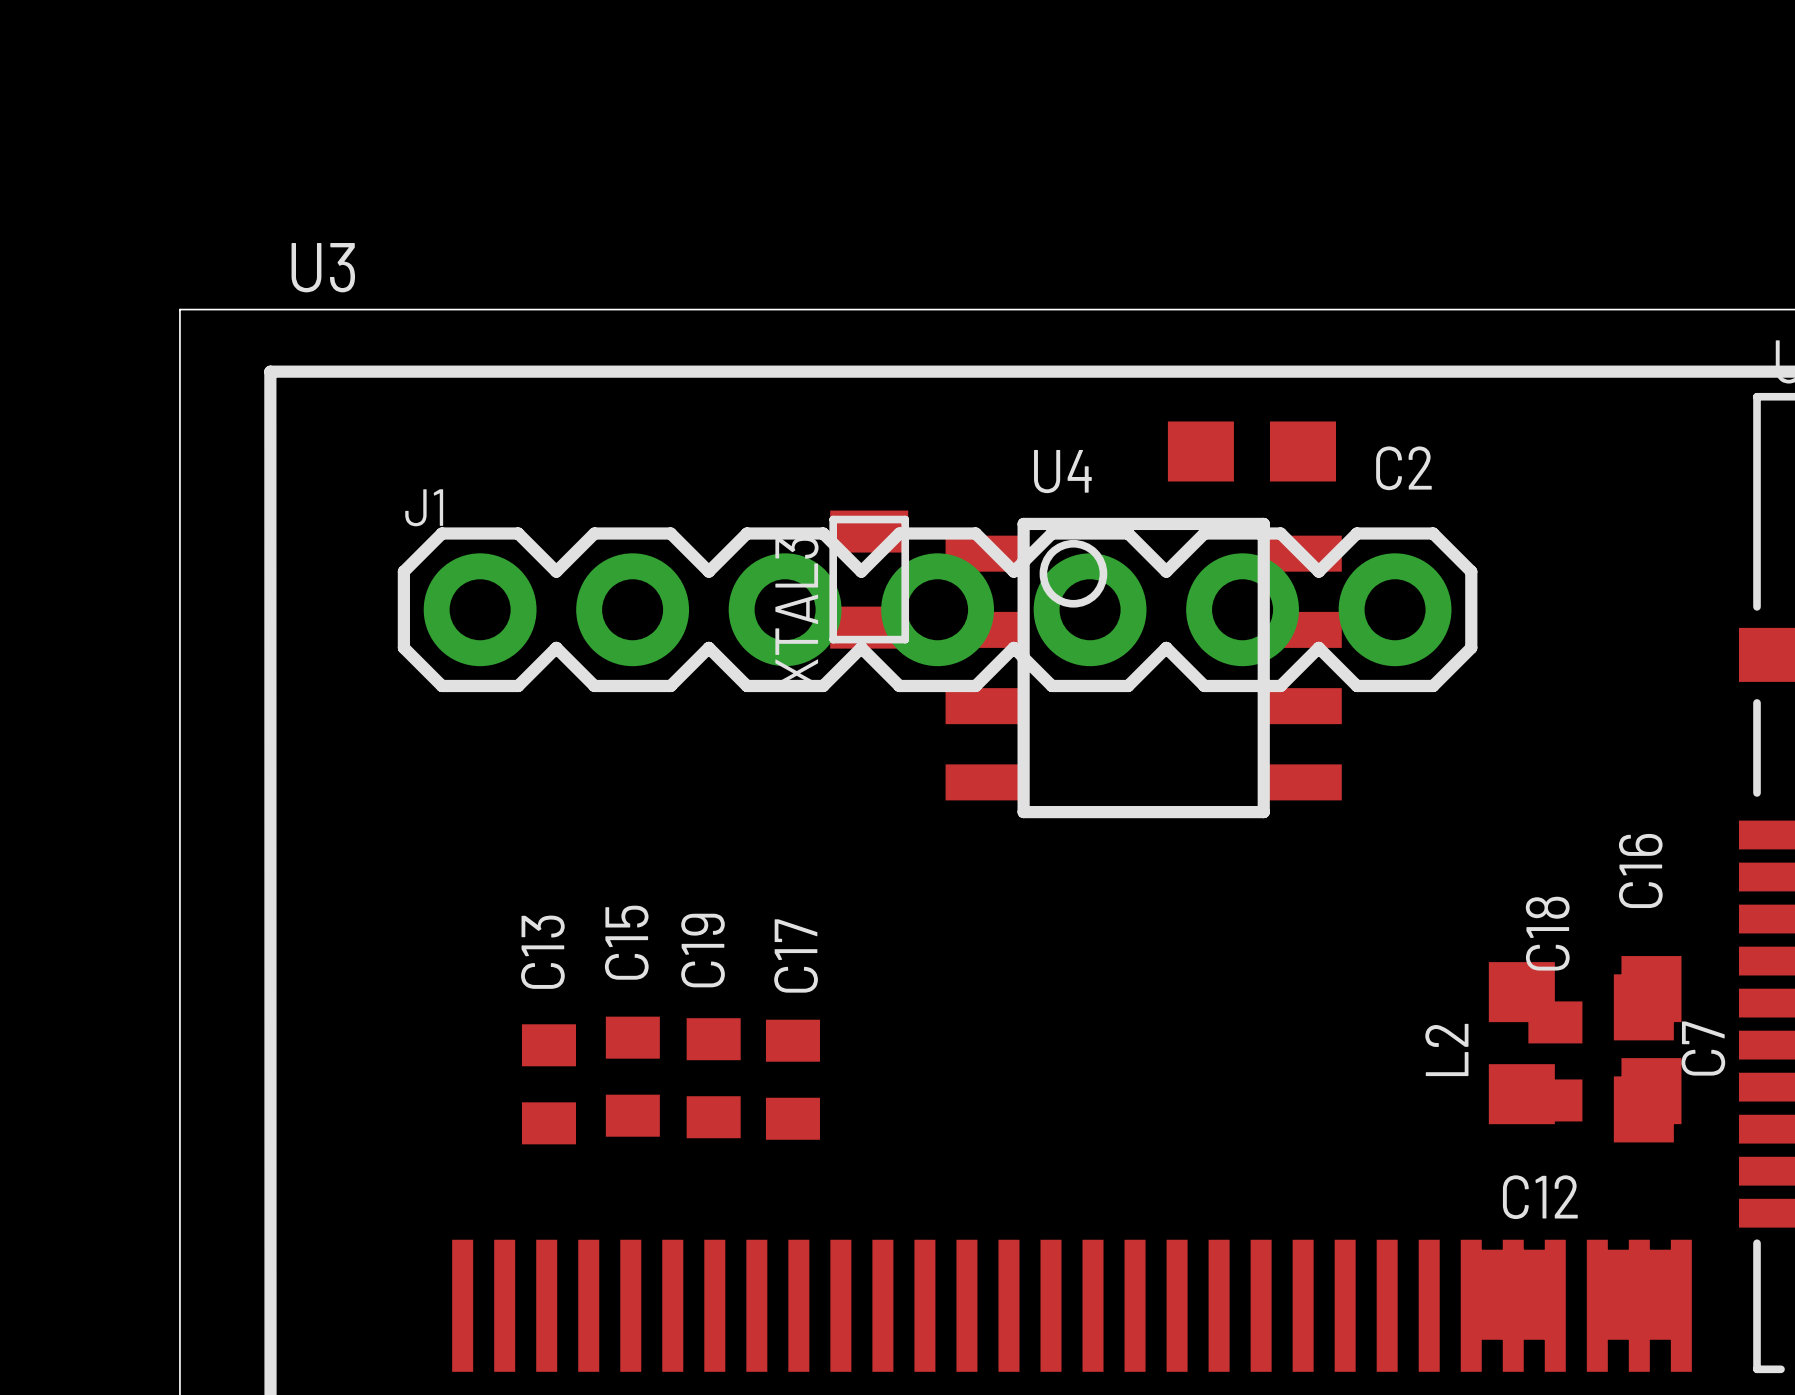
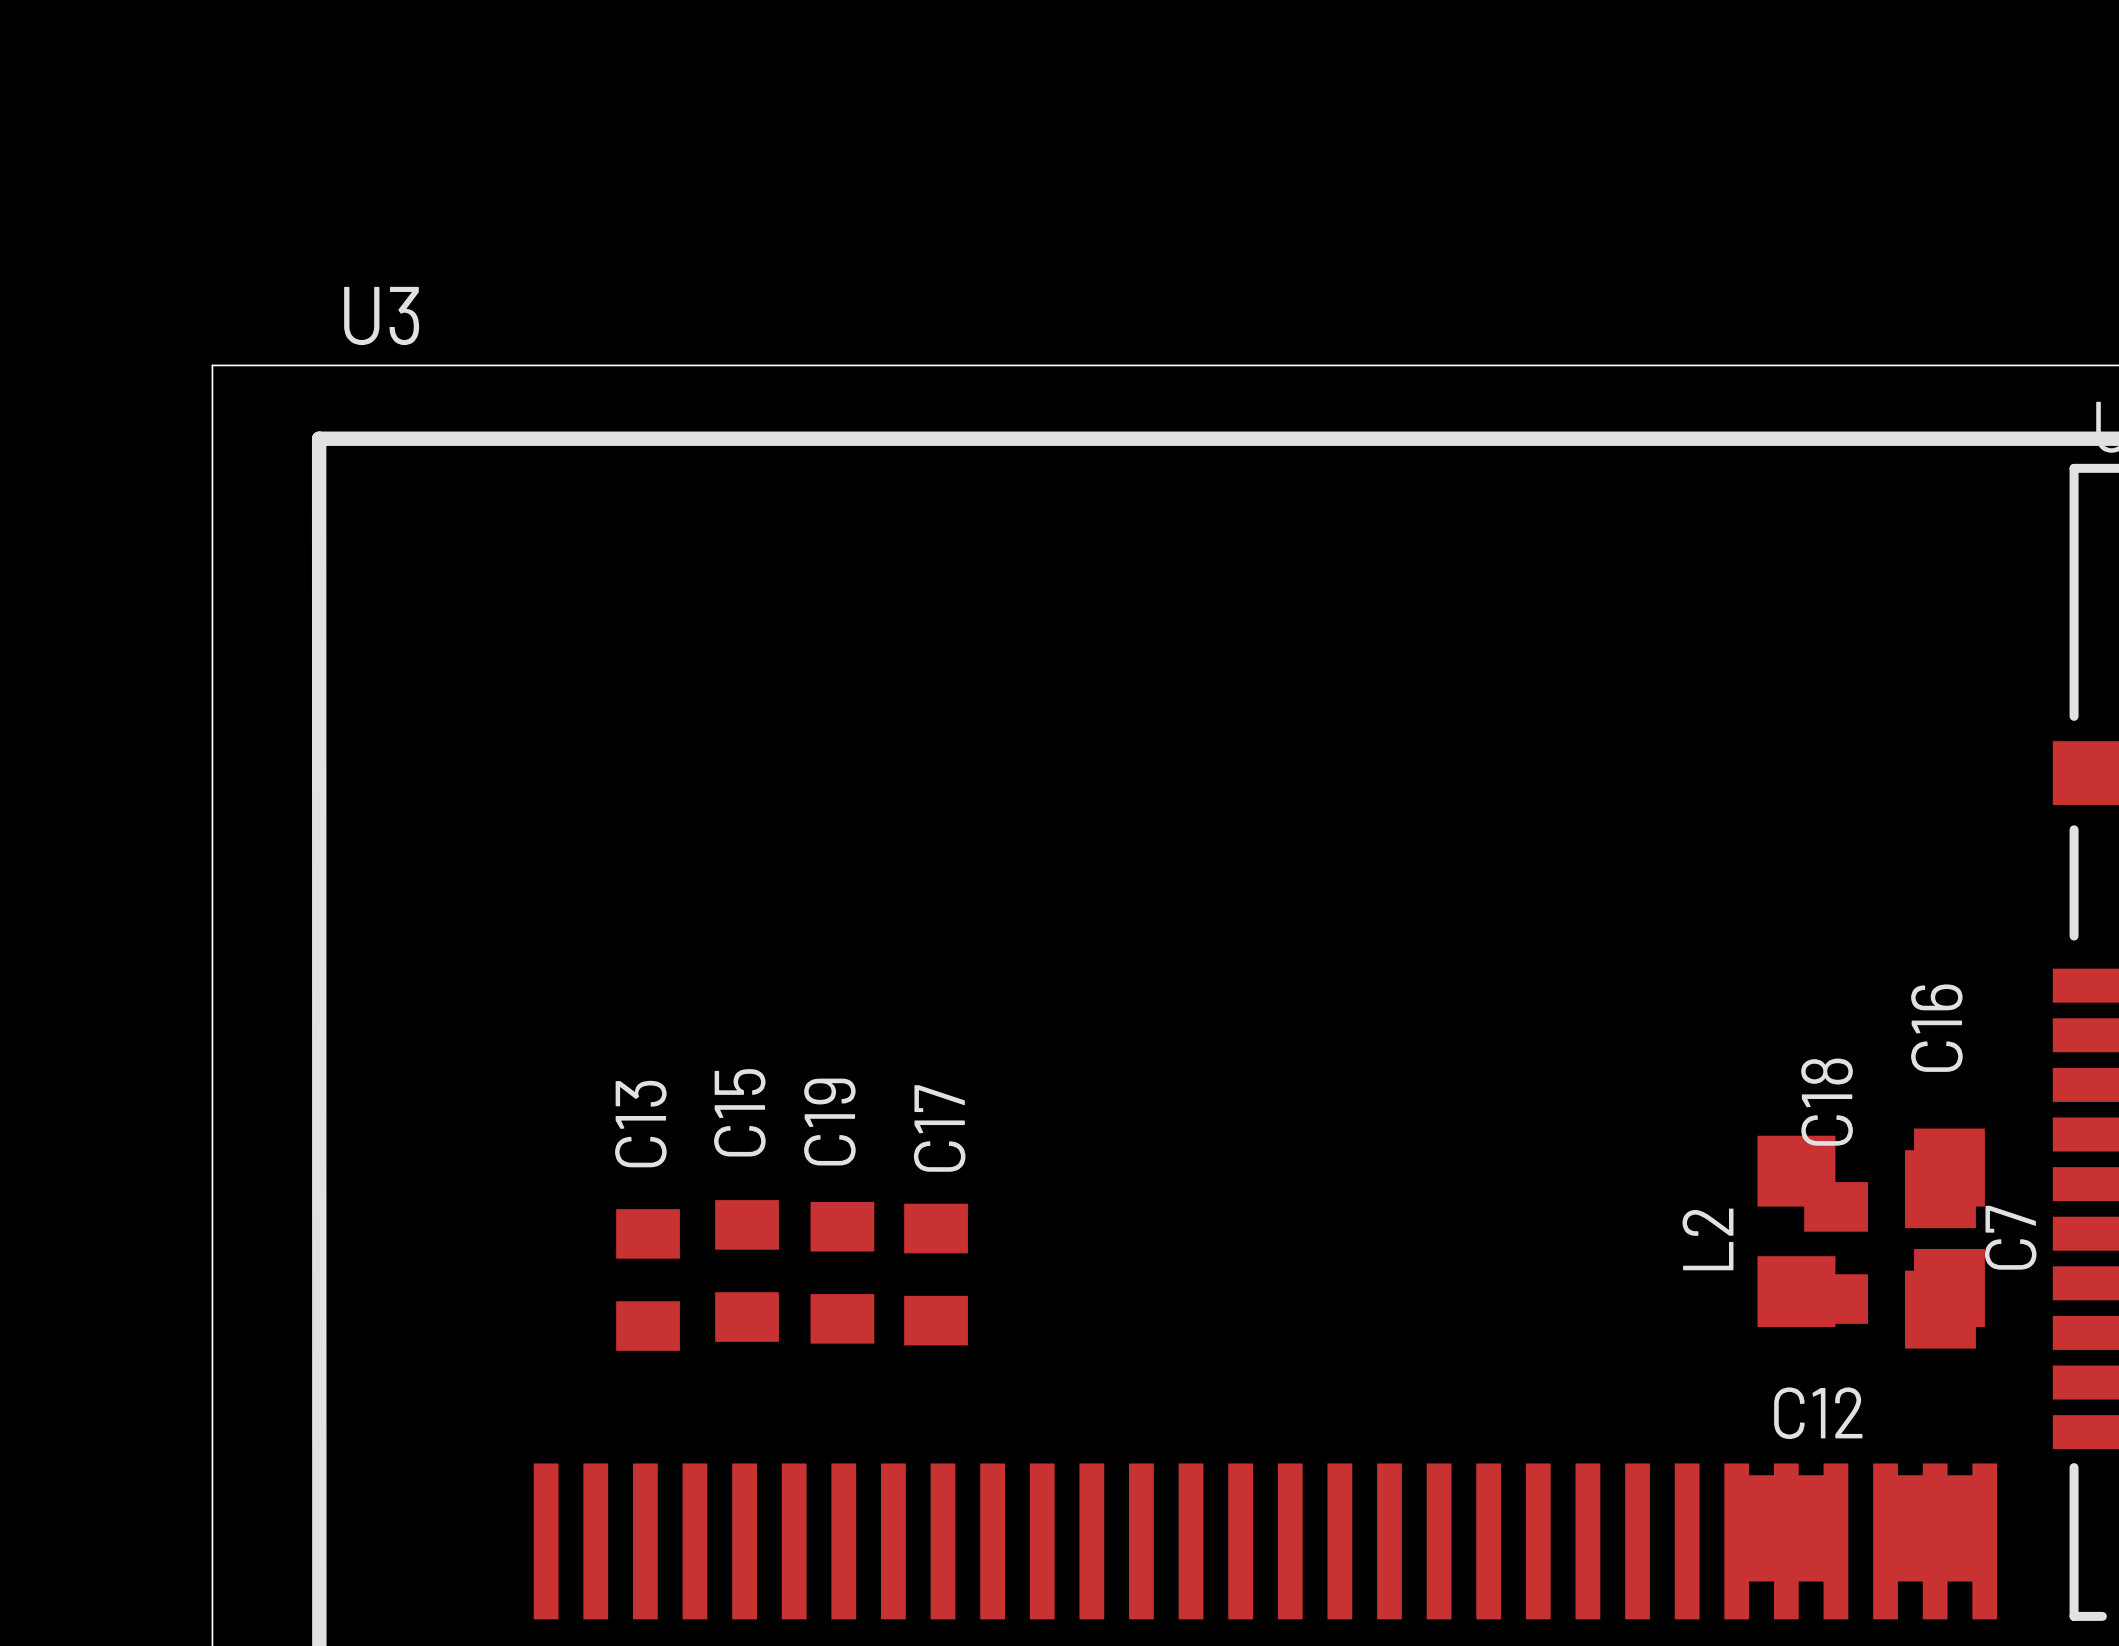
C2: (1251, 451) -> none
XTAL3: (869, 579) -> none
J1: (937, 609) -> none
U4: (1143, 668) -> none

